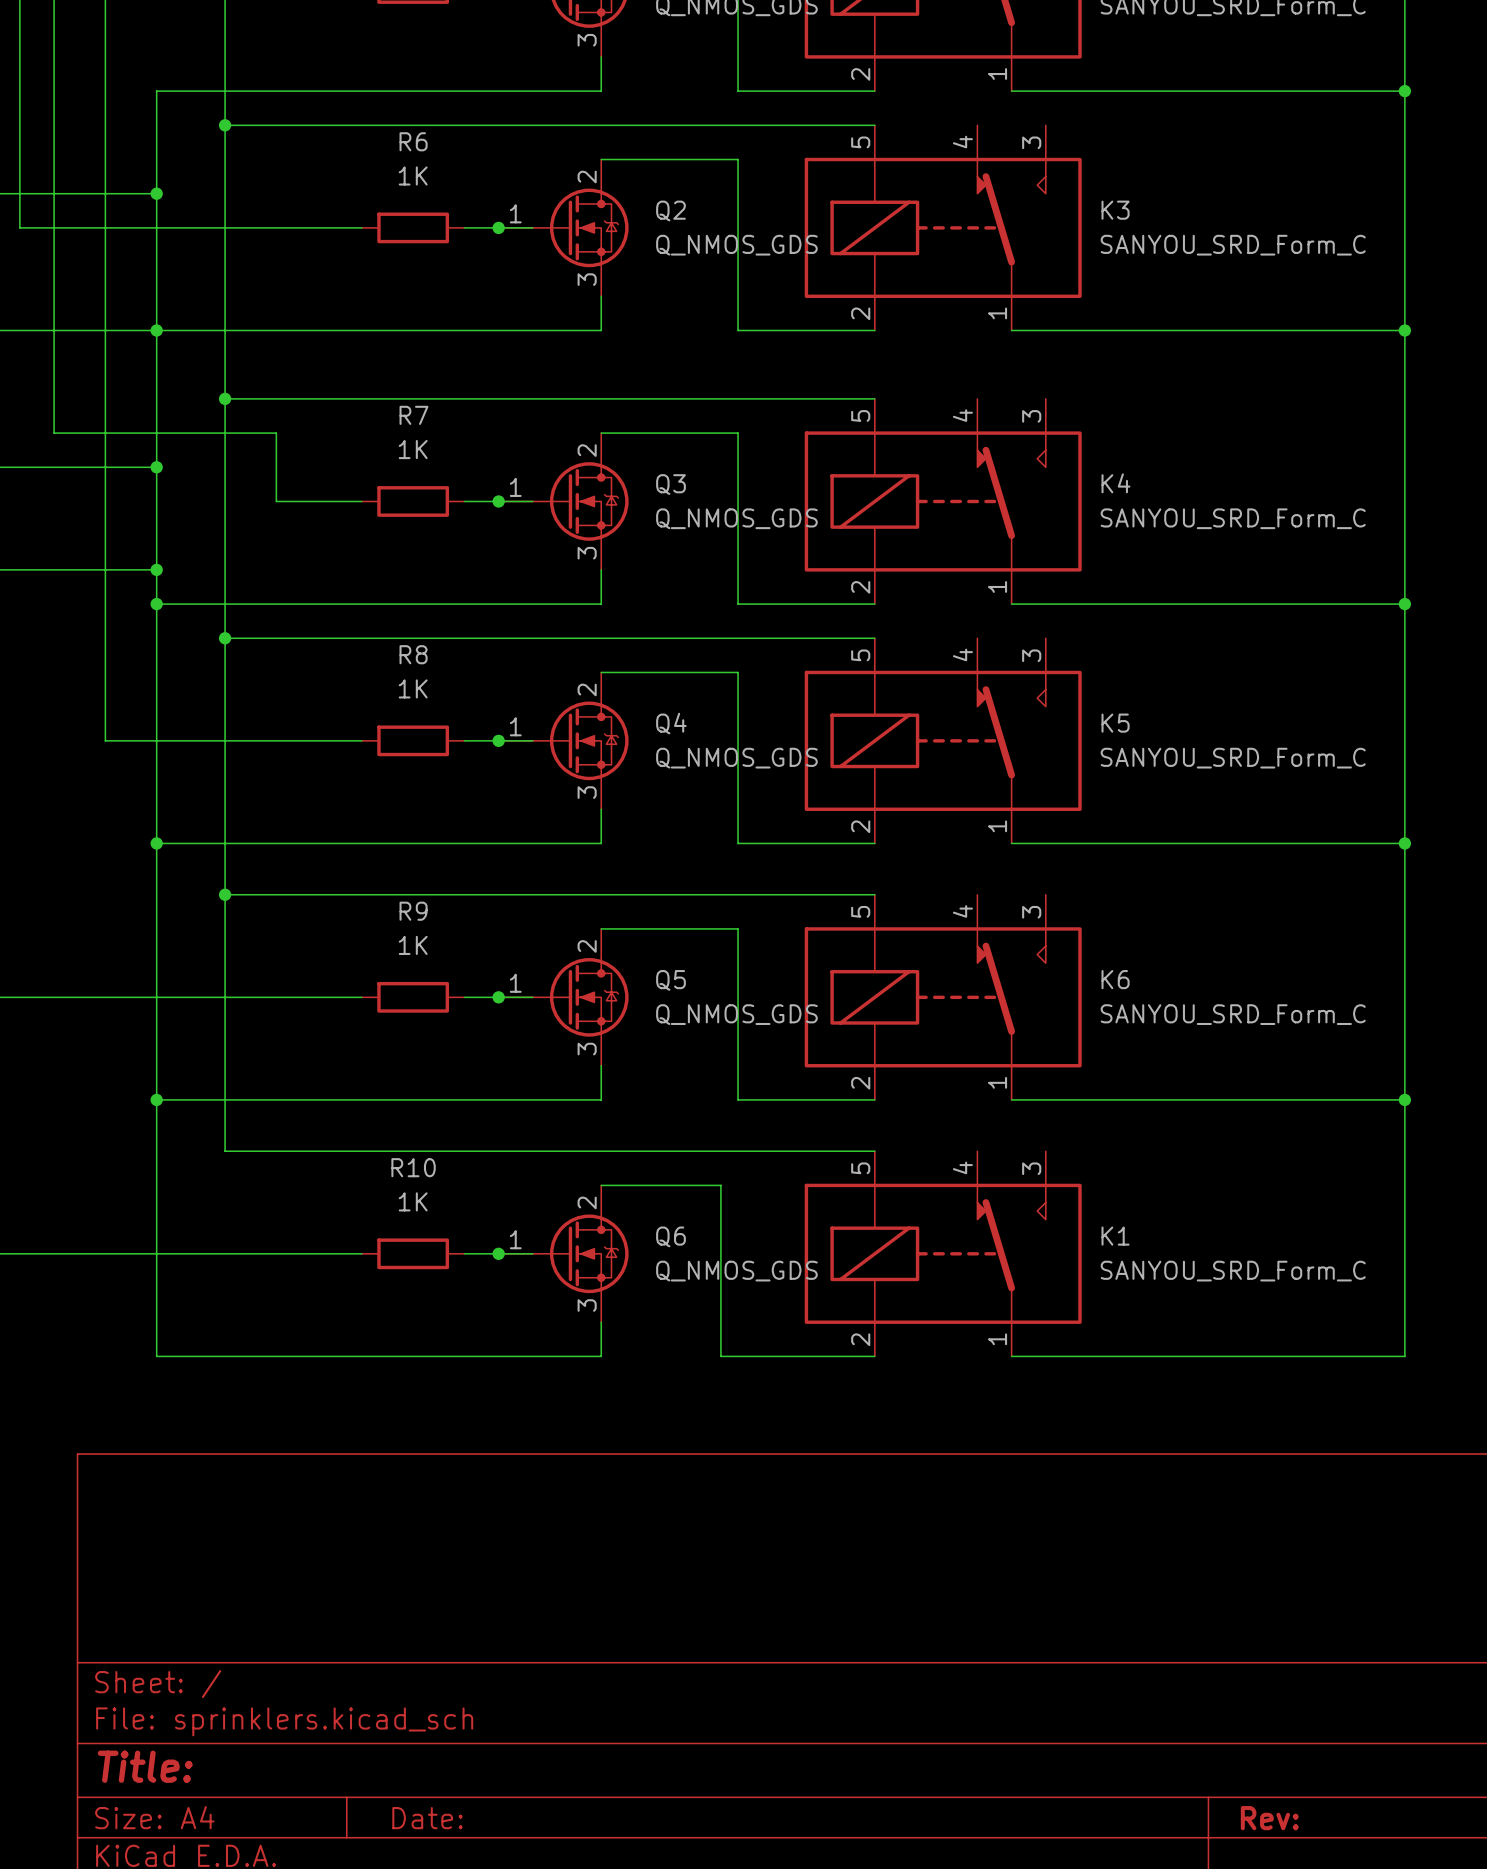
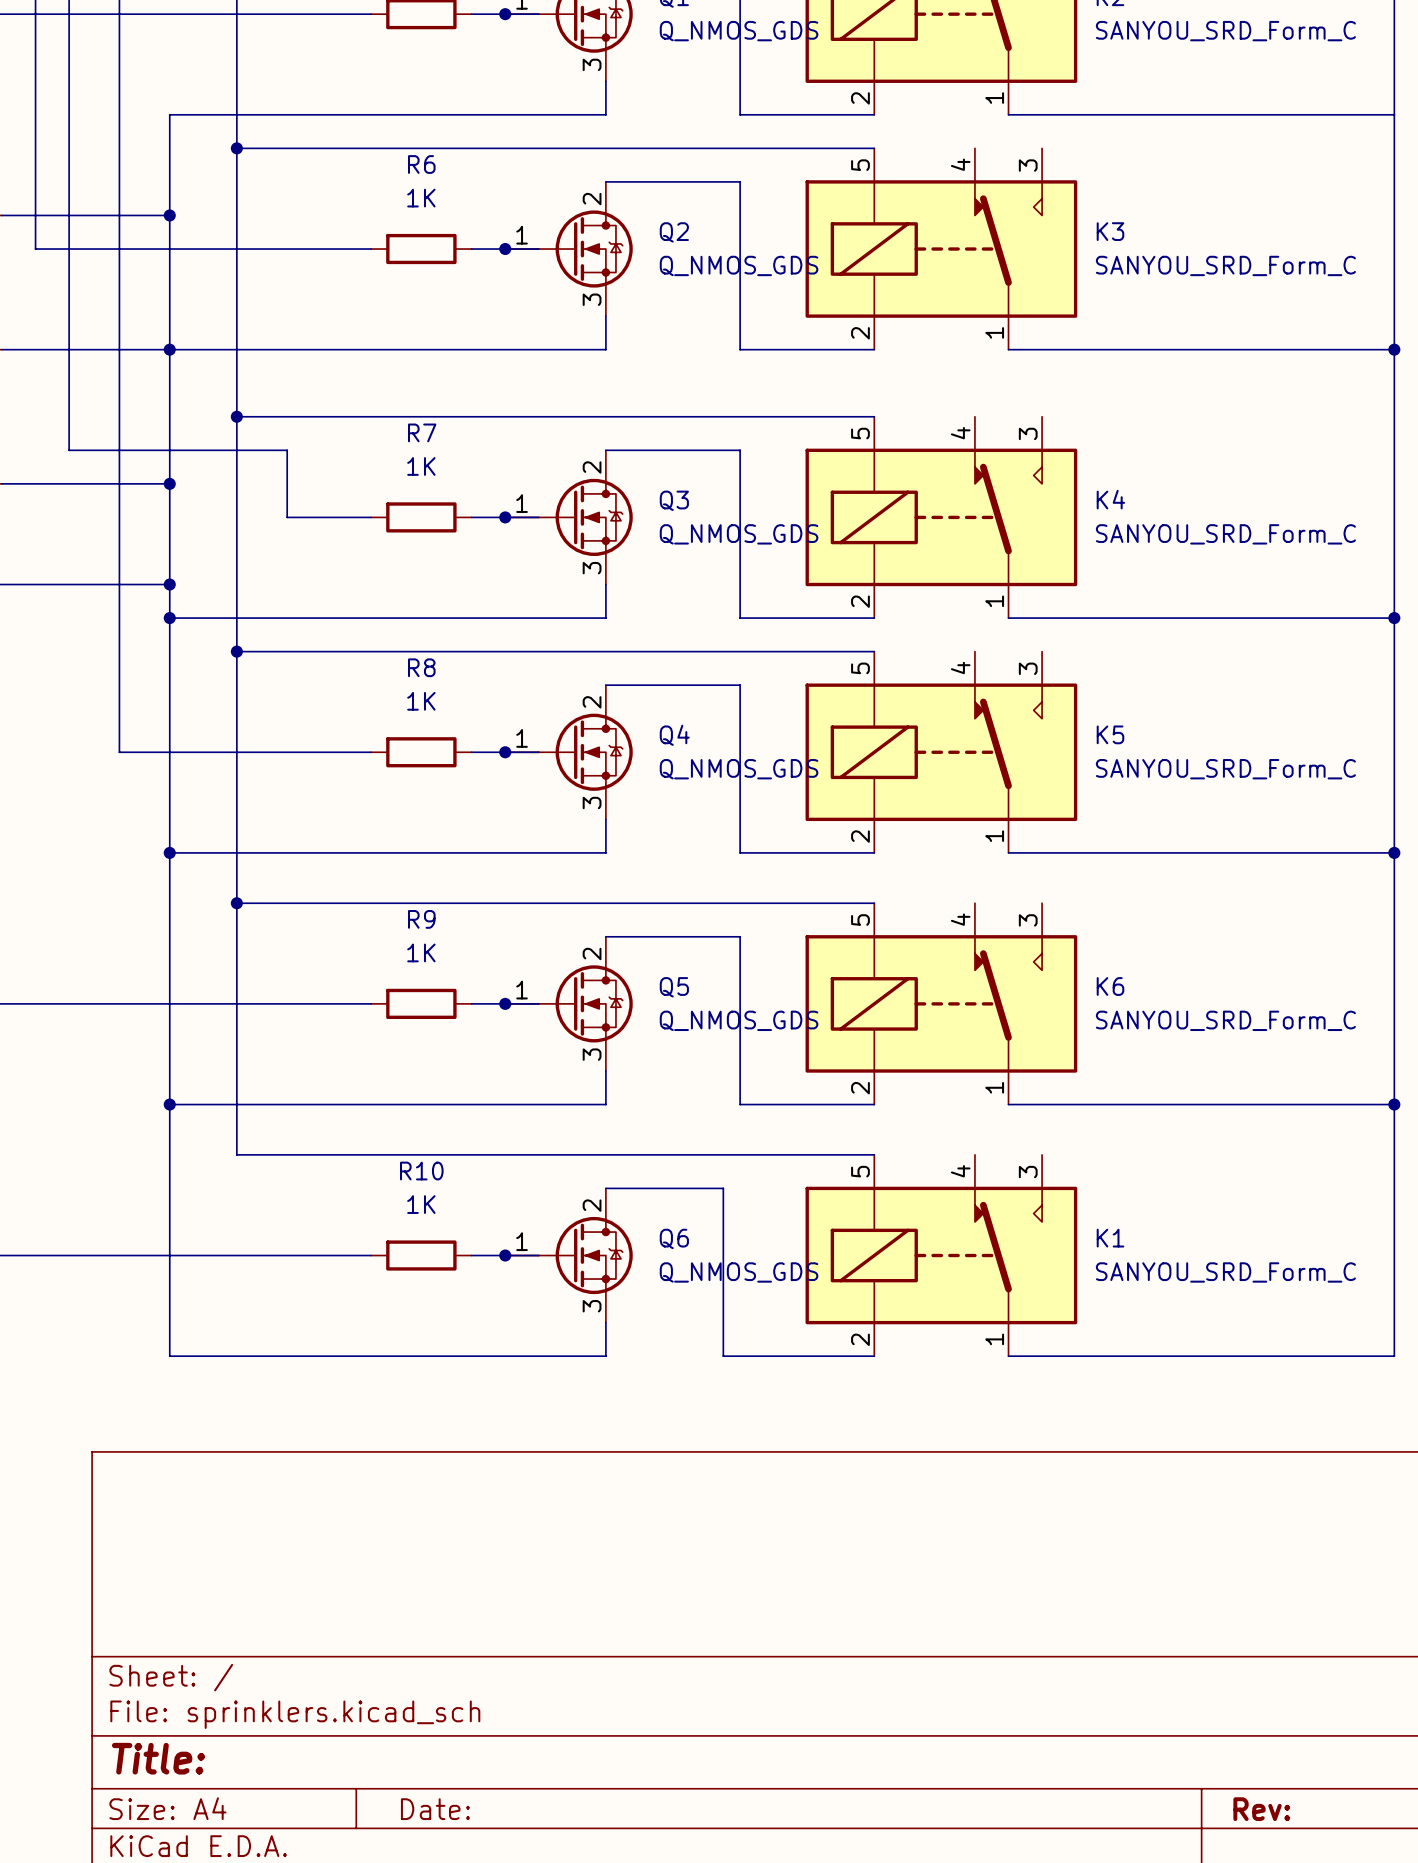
junction: (1404, 91) -> none

